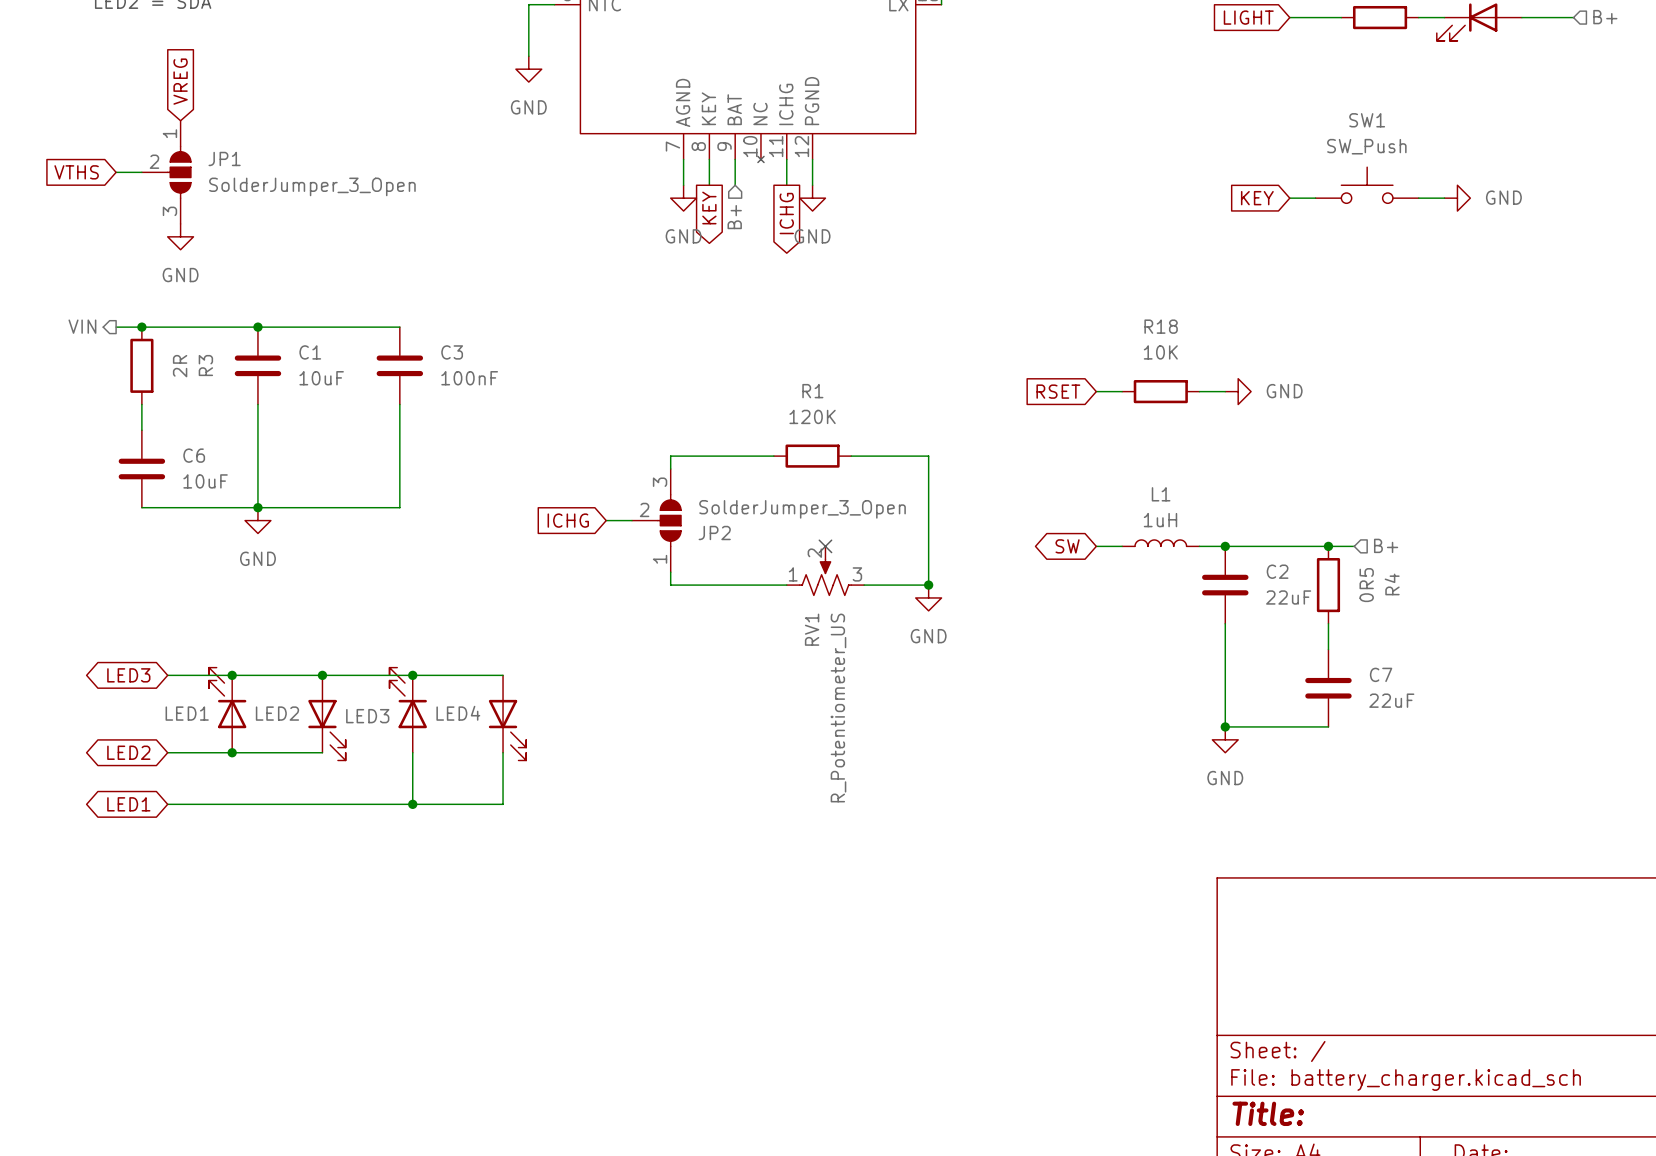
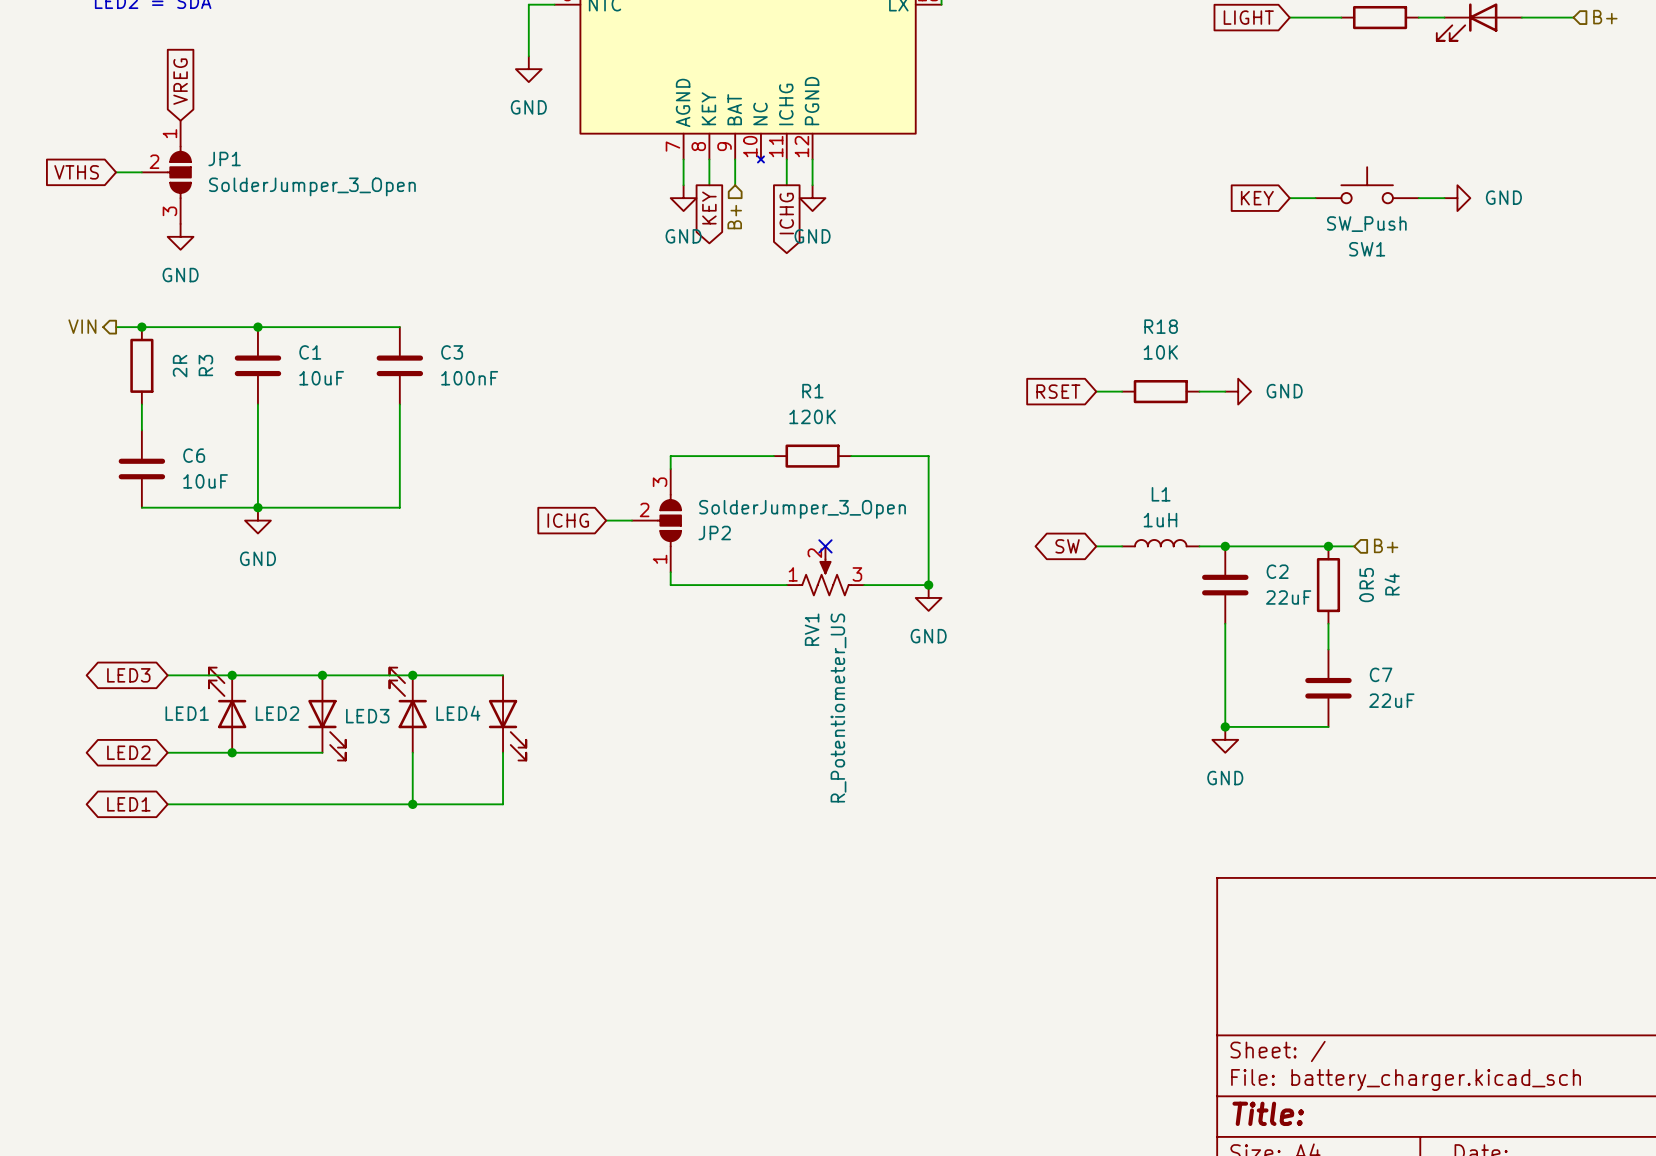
SW1 name position: SW1 (1367, 120) -> SW1 (1367, 249)
SW1 value position: SW_Push (1366, 146) -> SW_Push (1366, 224)

